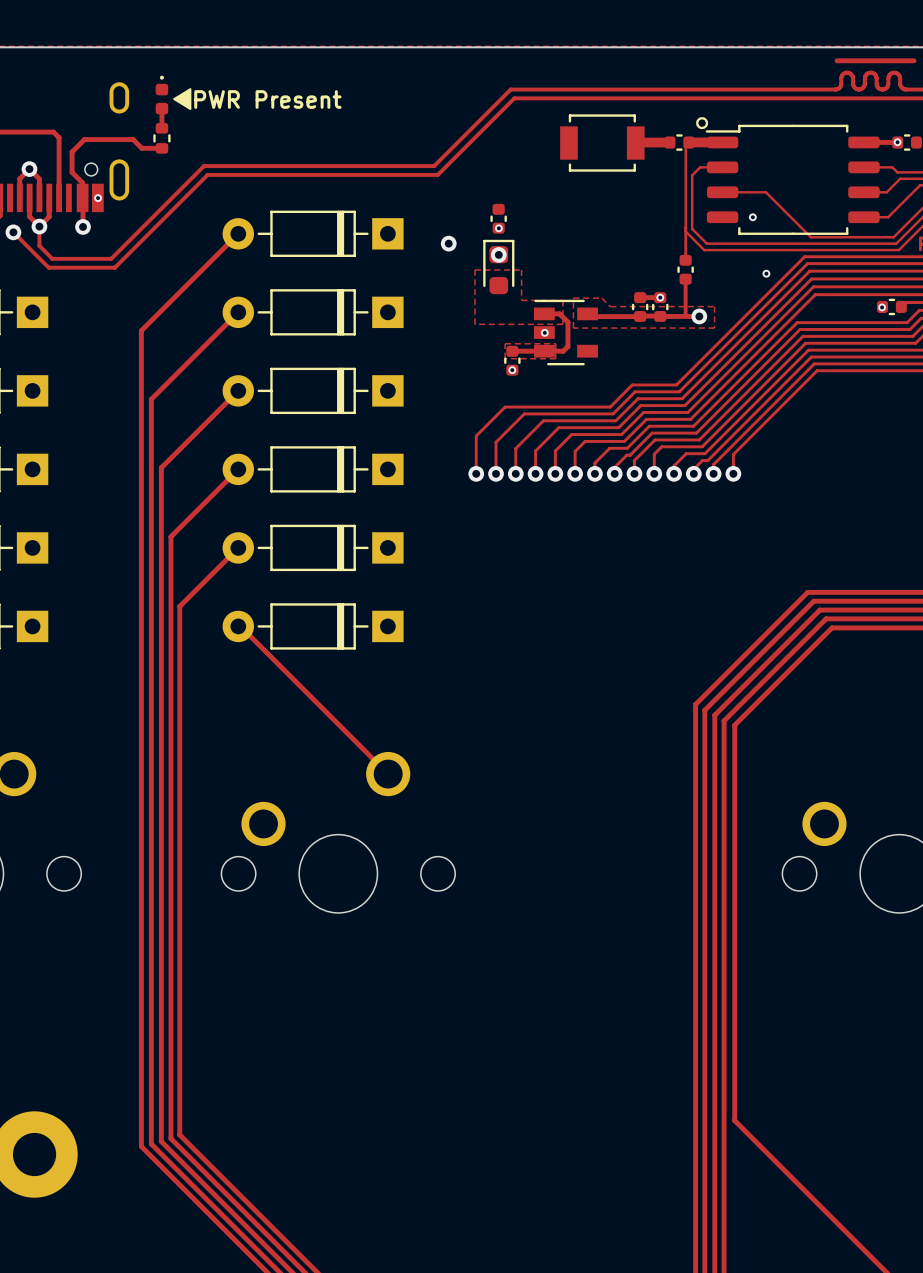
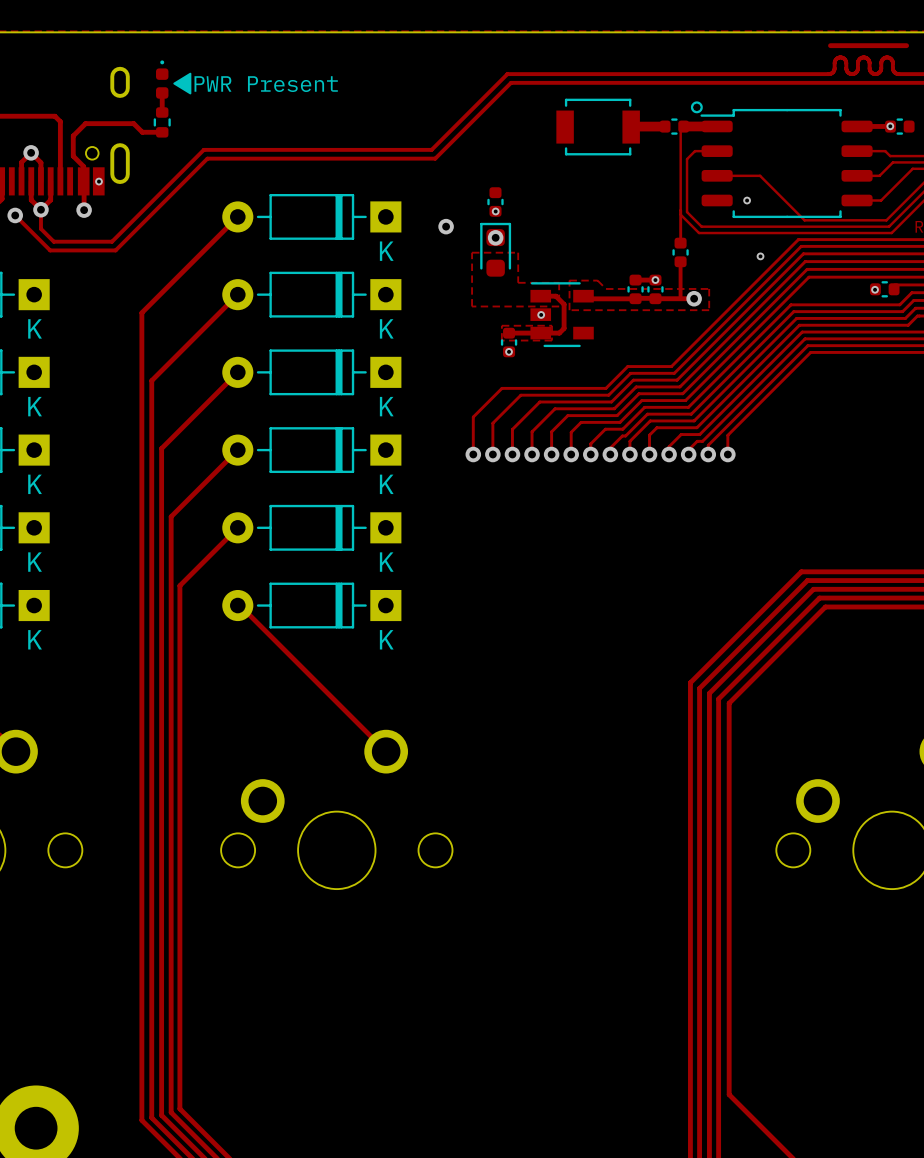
part text: none -> K (386, 251)
part text: none -> K (35, 328)
part text: none -> K (386, 328)
part text: none -> K (35, 406)
part text: none -> K (386, 406)
part text: none -> K (35, 484)
part text: none -> K (386, 484)
part text: none -> K (35, 562)
part text: none -> K (386, 562)
part text: none -> K (35, 639)
part text: none -> K (386, 639)

